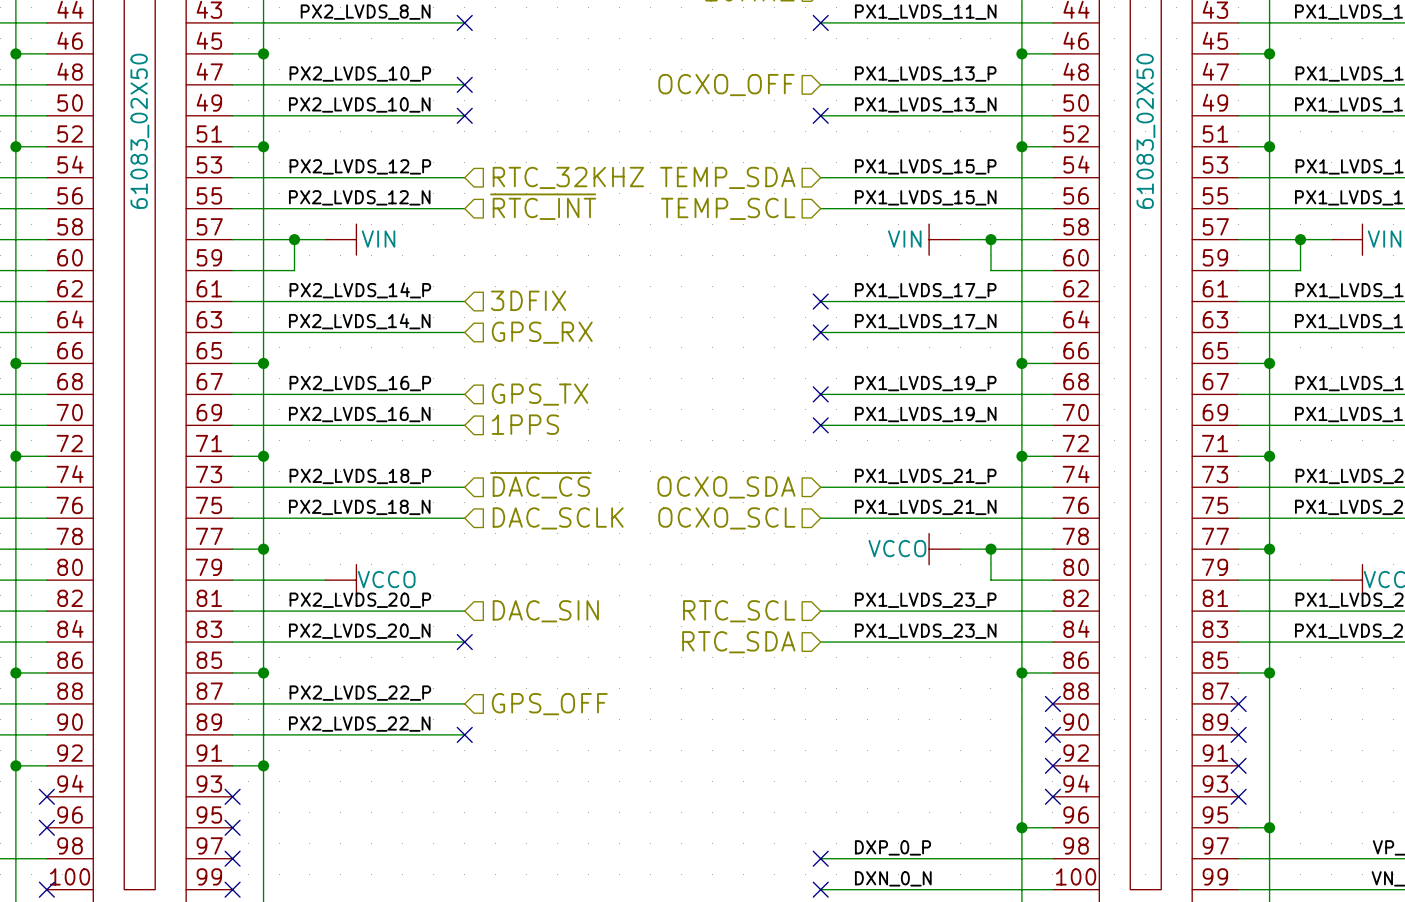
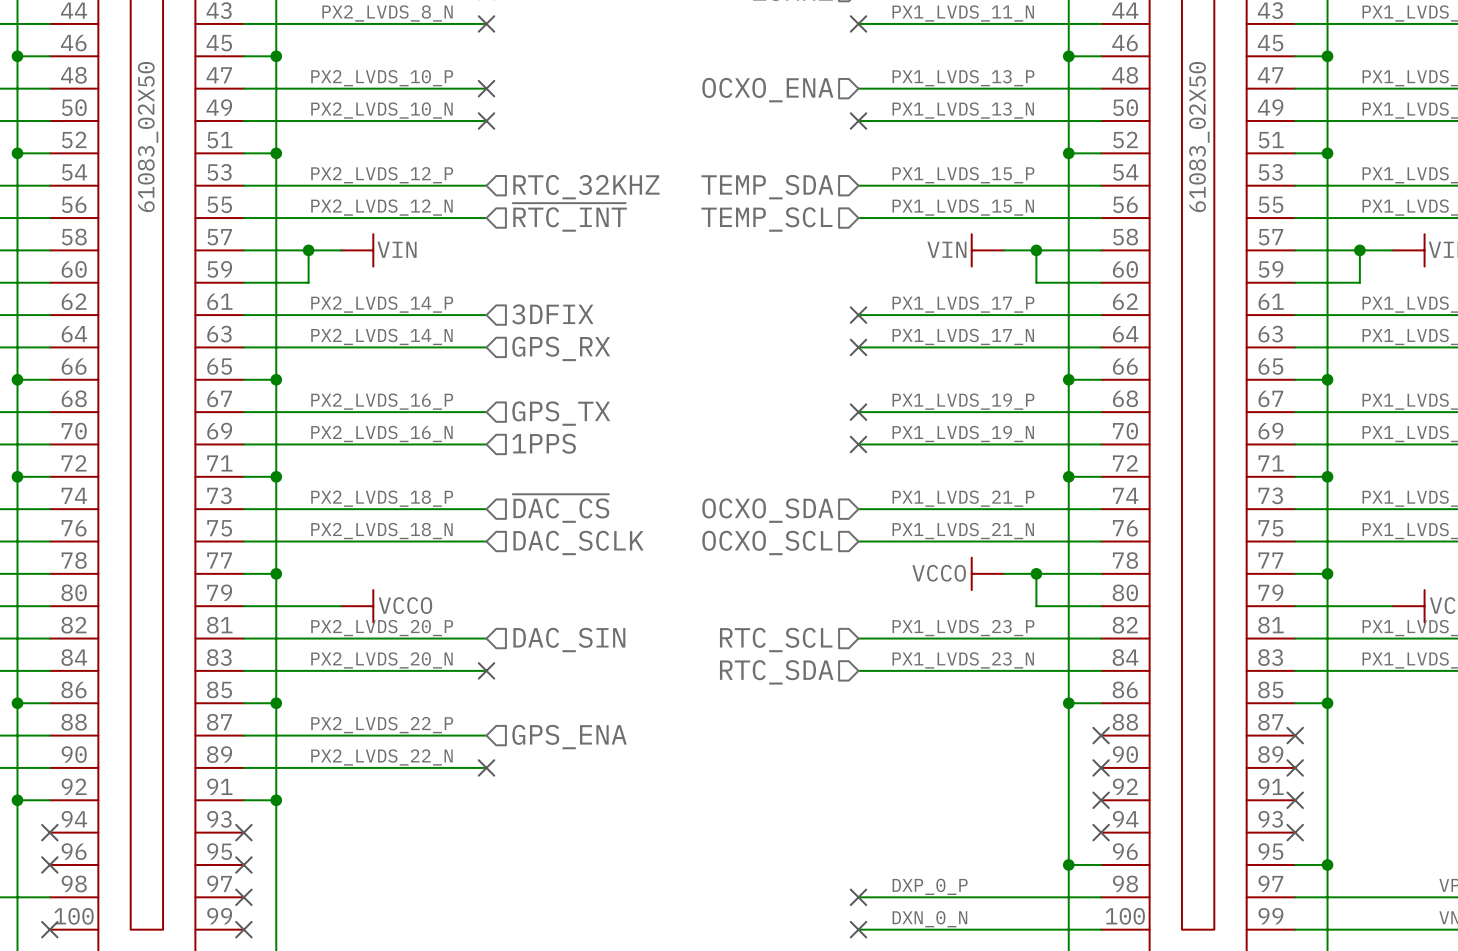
hierarchical label: OCXO_OFF (726, 85) -> OCXO_ENA (767, 90)
hierarchical label: GPS_OFF (549, 704) -> GPS_ENA (569, 737)

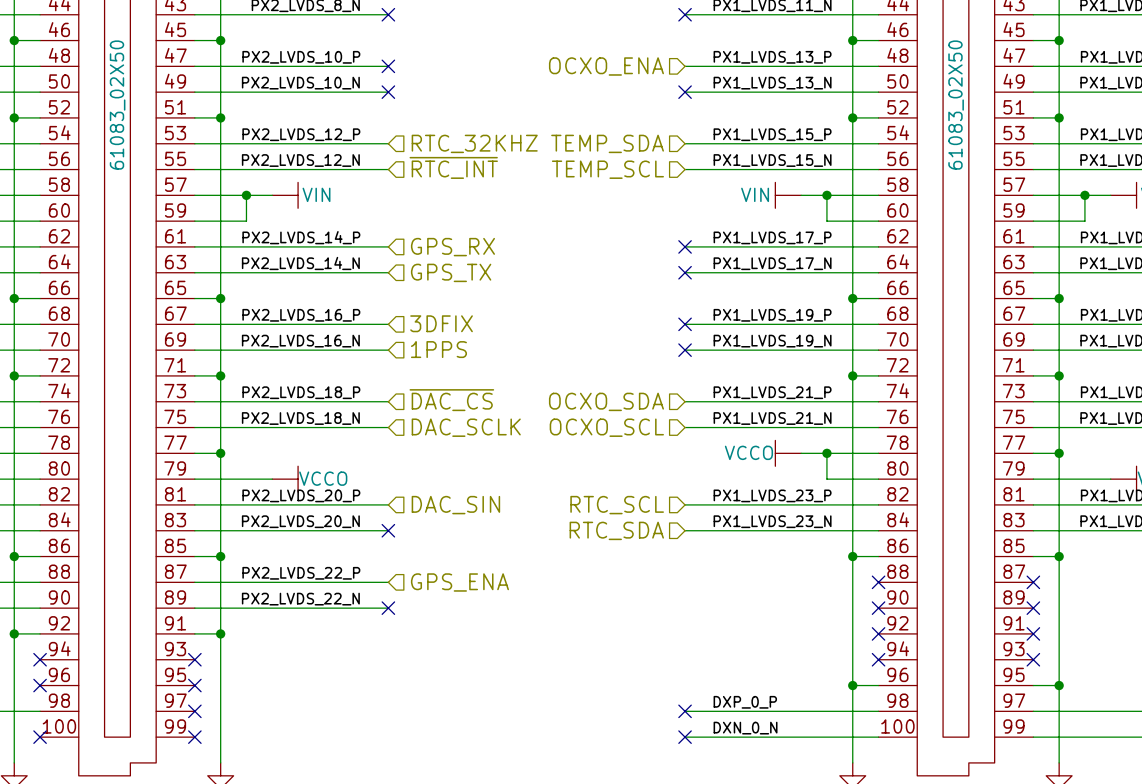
hierarchical label: 3DFIX (552, 314) -> GPS_RX (452, 247)
hierarchical label: GPS_RX (561, 348) -> GPS_TX (451, 272)
hierarchical label: GPS_TX (561, 413) -> 3DFIX (441, 323)

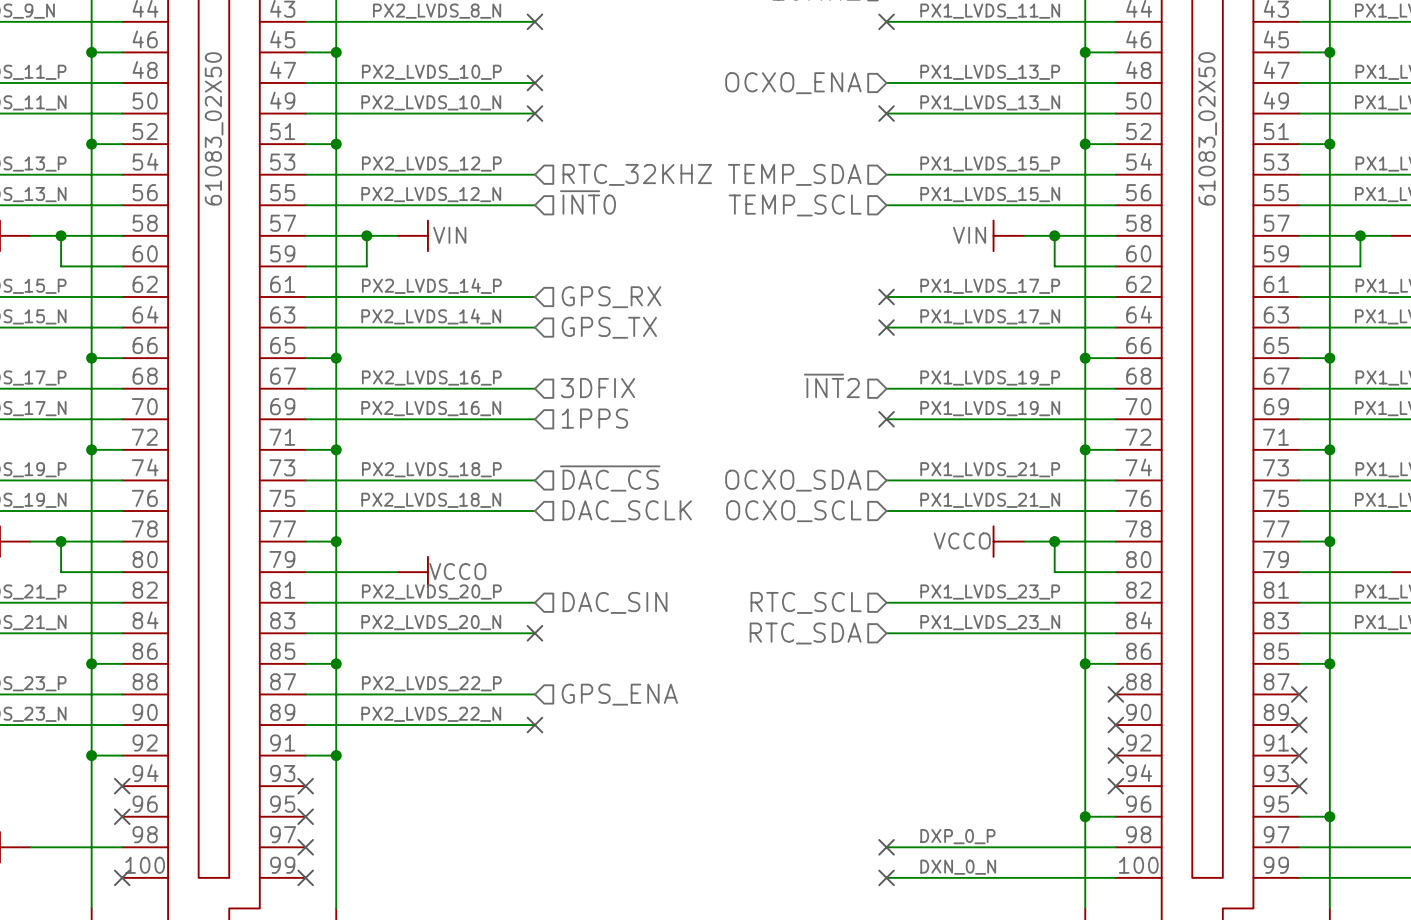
hierarchical label: ~{RTC_INT} (453, 167) -> ~{INT}0 (587, 202)
hierarchical label: none -> ~{INT}2 (831, 385)
no-connect mark: (685, 324) -> none

